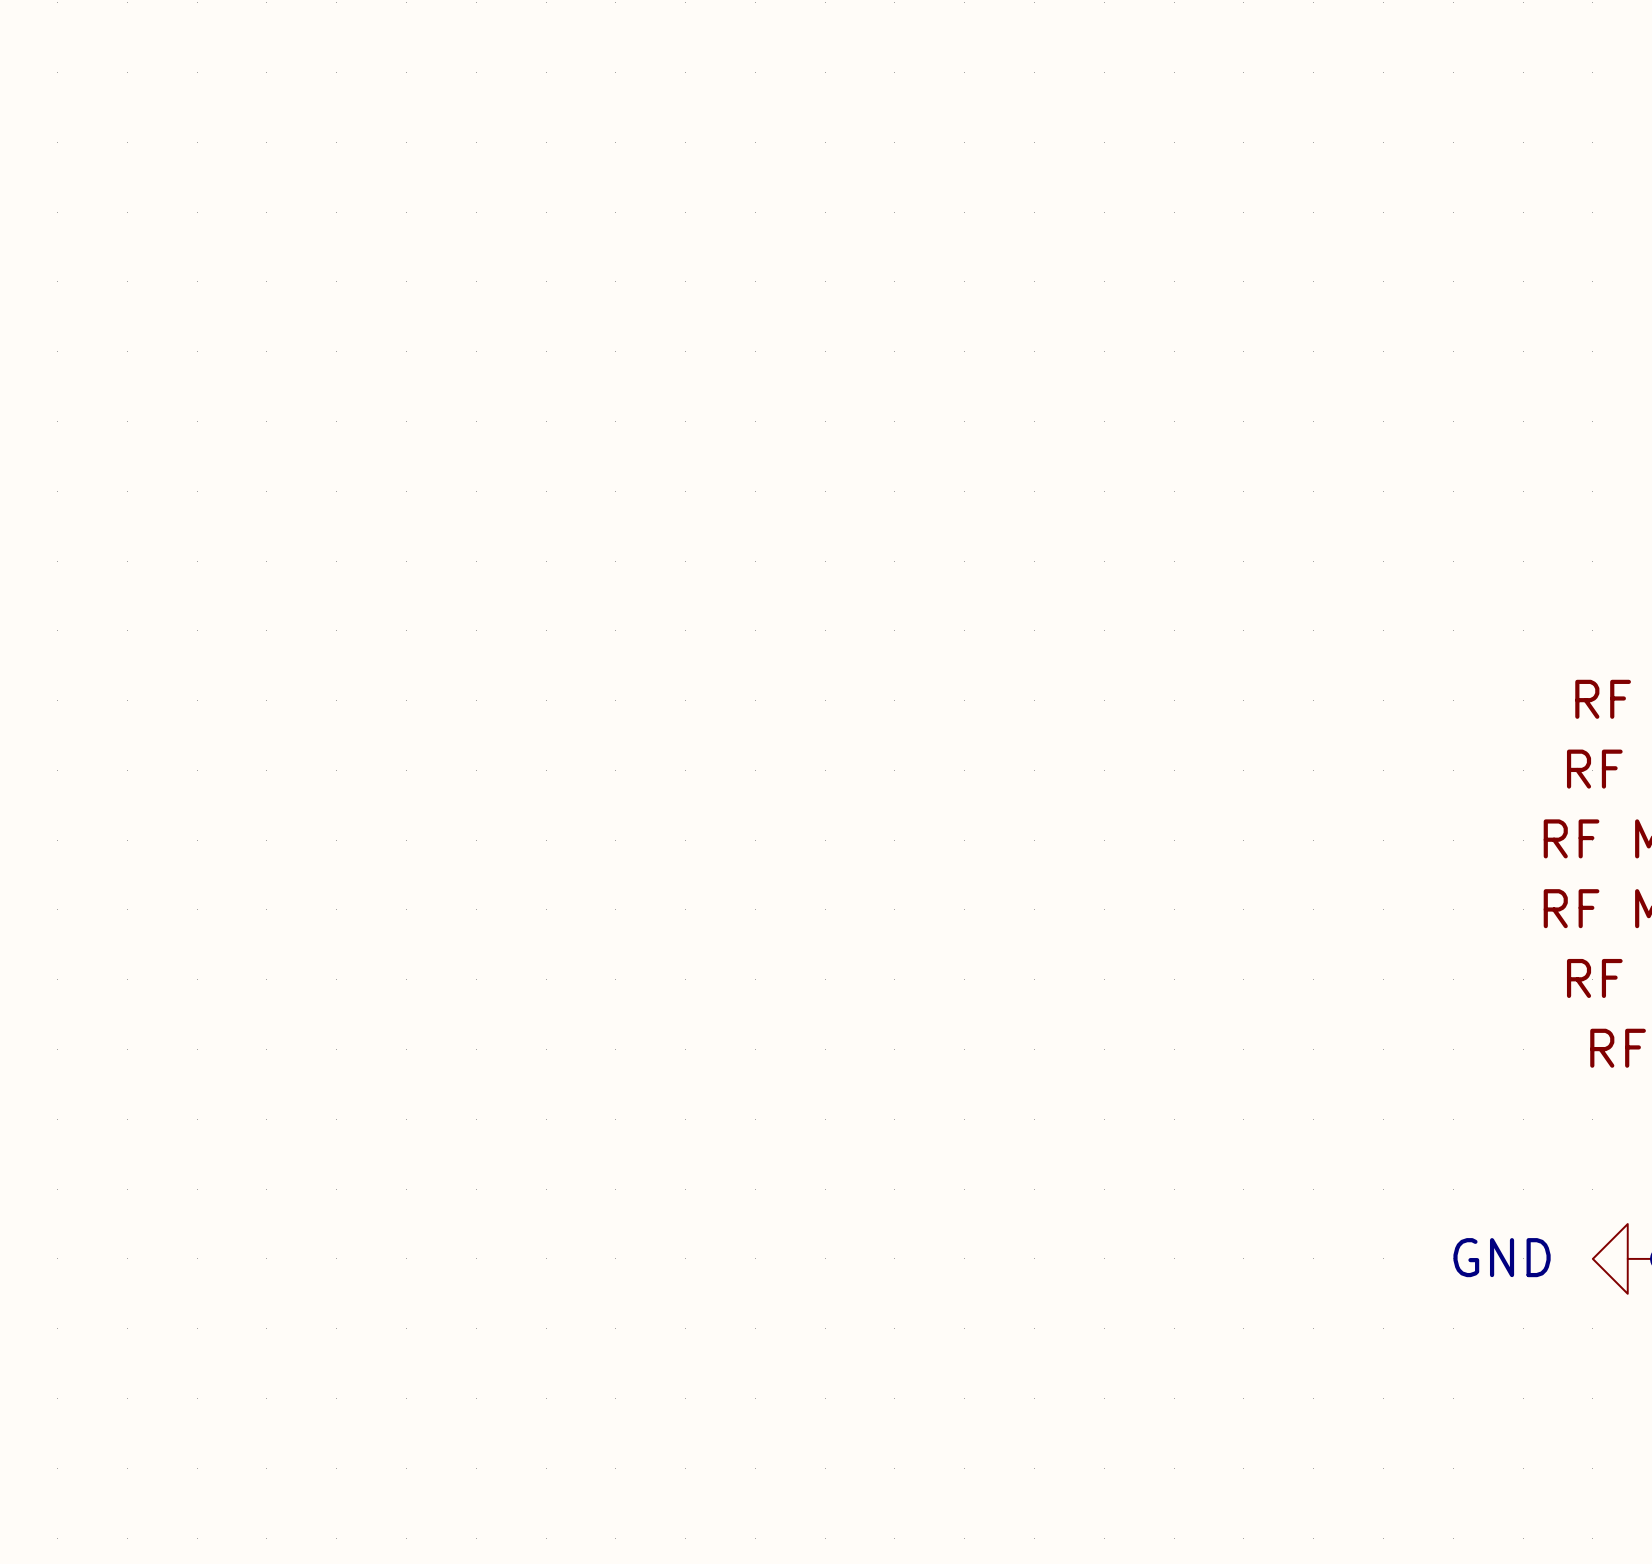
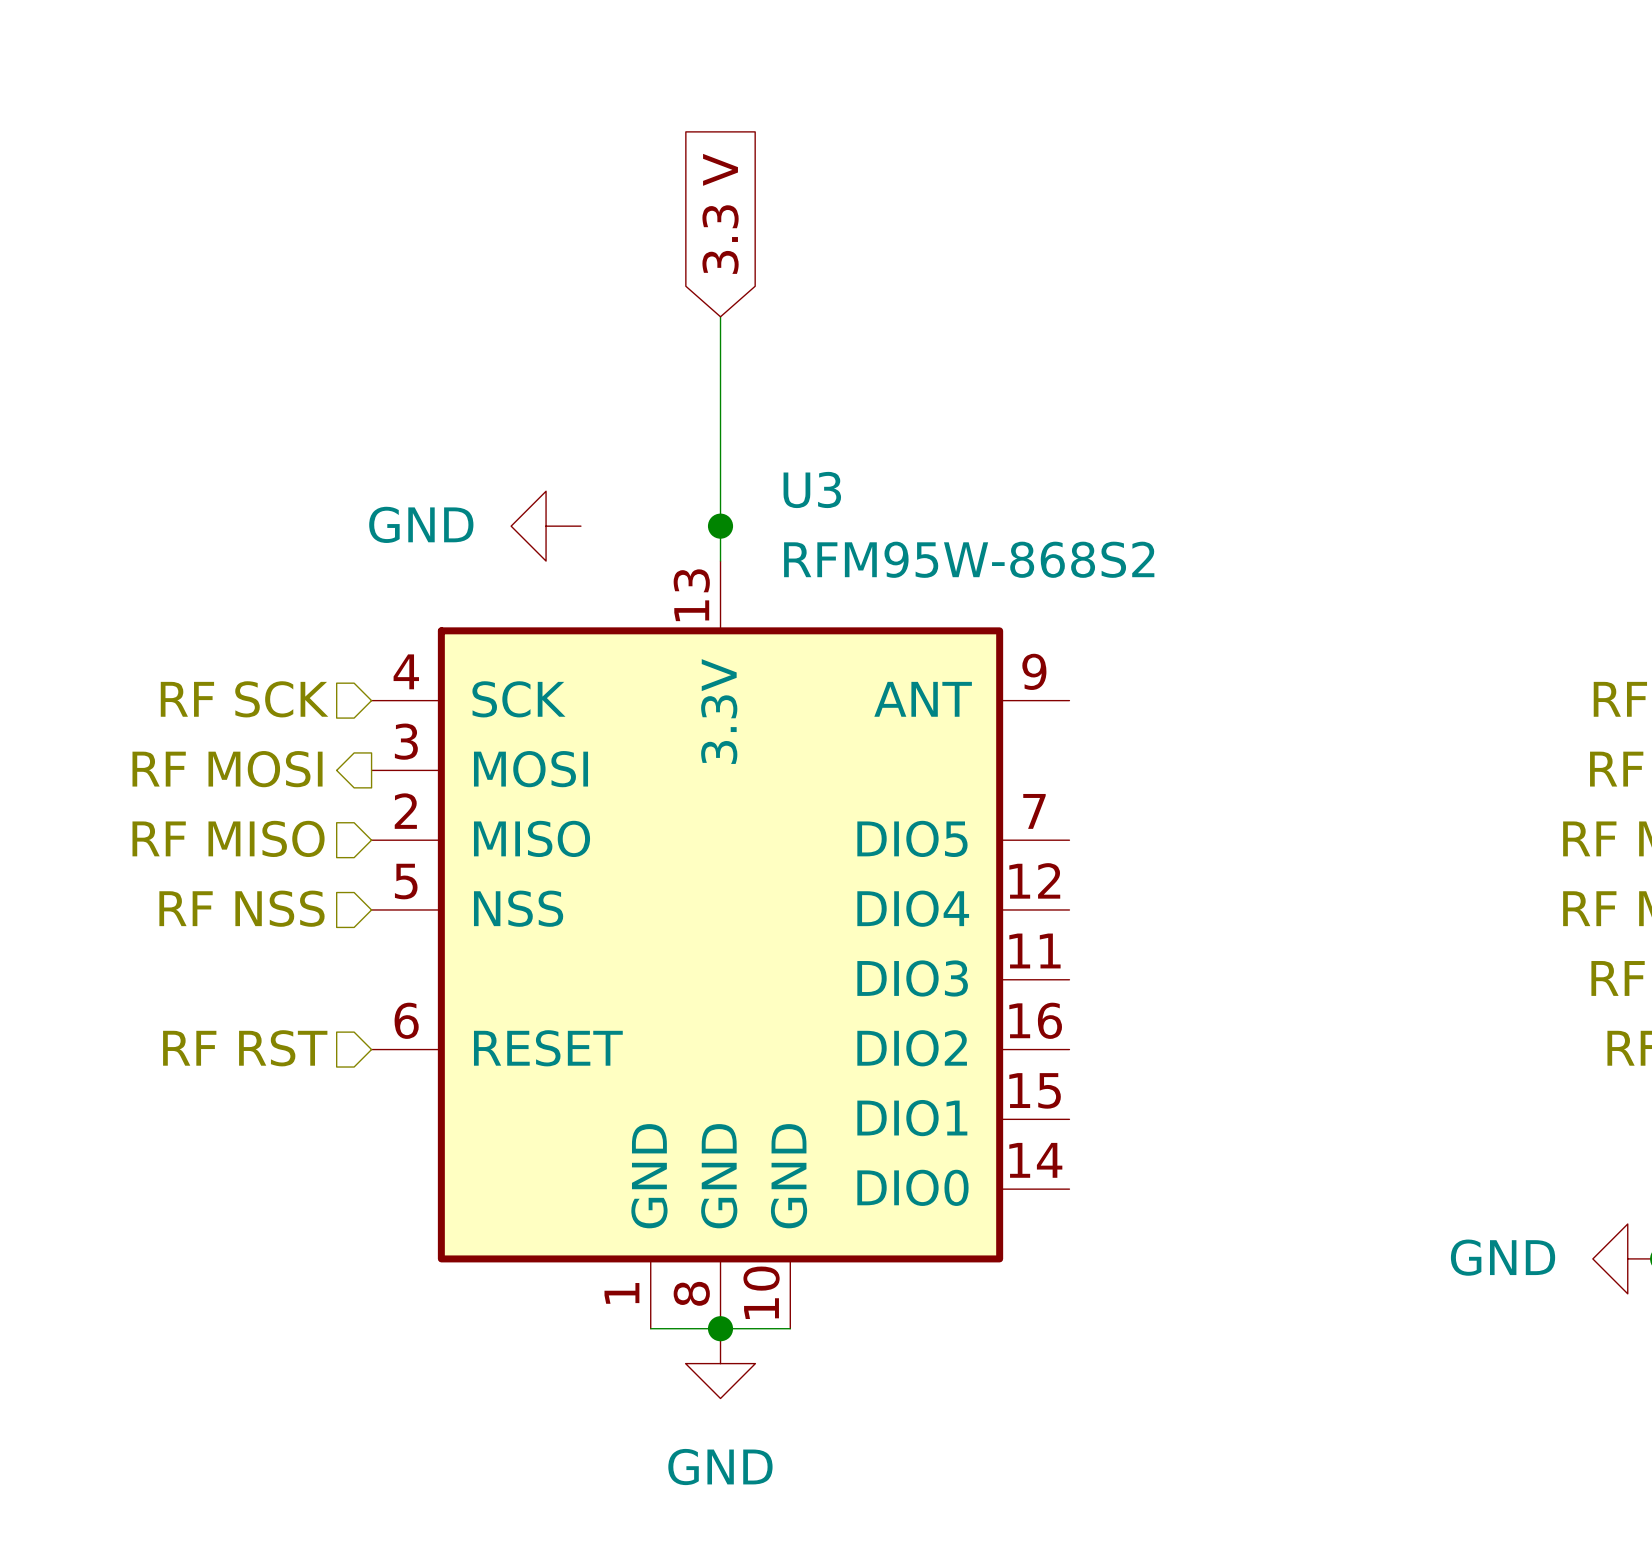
global label: none -> 3.3 V (720, 213)
wire: none -> (720, 316) (720, 561)
power symbol: none -> GND (546, 526)
junction: none -> (720, 526)
hierarchical label: none -> RF SCK (244, 699)
hierarchical label: none -> RF MOSI (227, 769)
hierarchical label: none -> RF MISO (228, 838)
hierarchical label: none -> RF NSS (241, 908)
U3: none -> RFM95W-868S2 (720, 944)
hierarchical label: none -> RF RST (245, 1048)
wire: none -> (650, 1328) (790, 1328)
junction: none -> (720, 1328)
power symbol: none -> GND (720, 1363)

